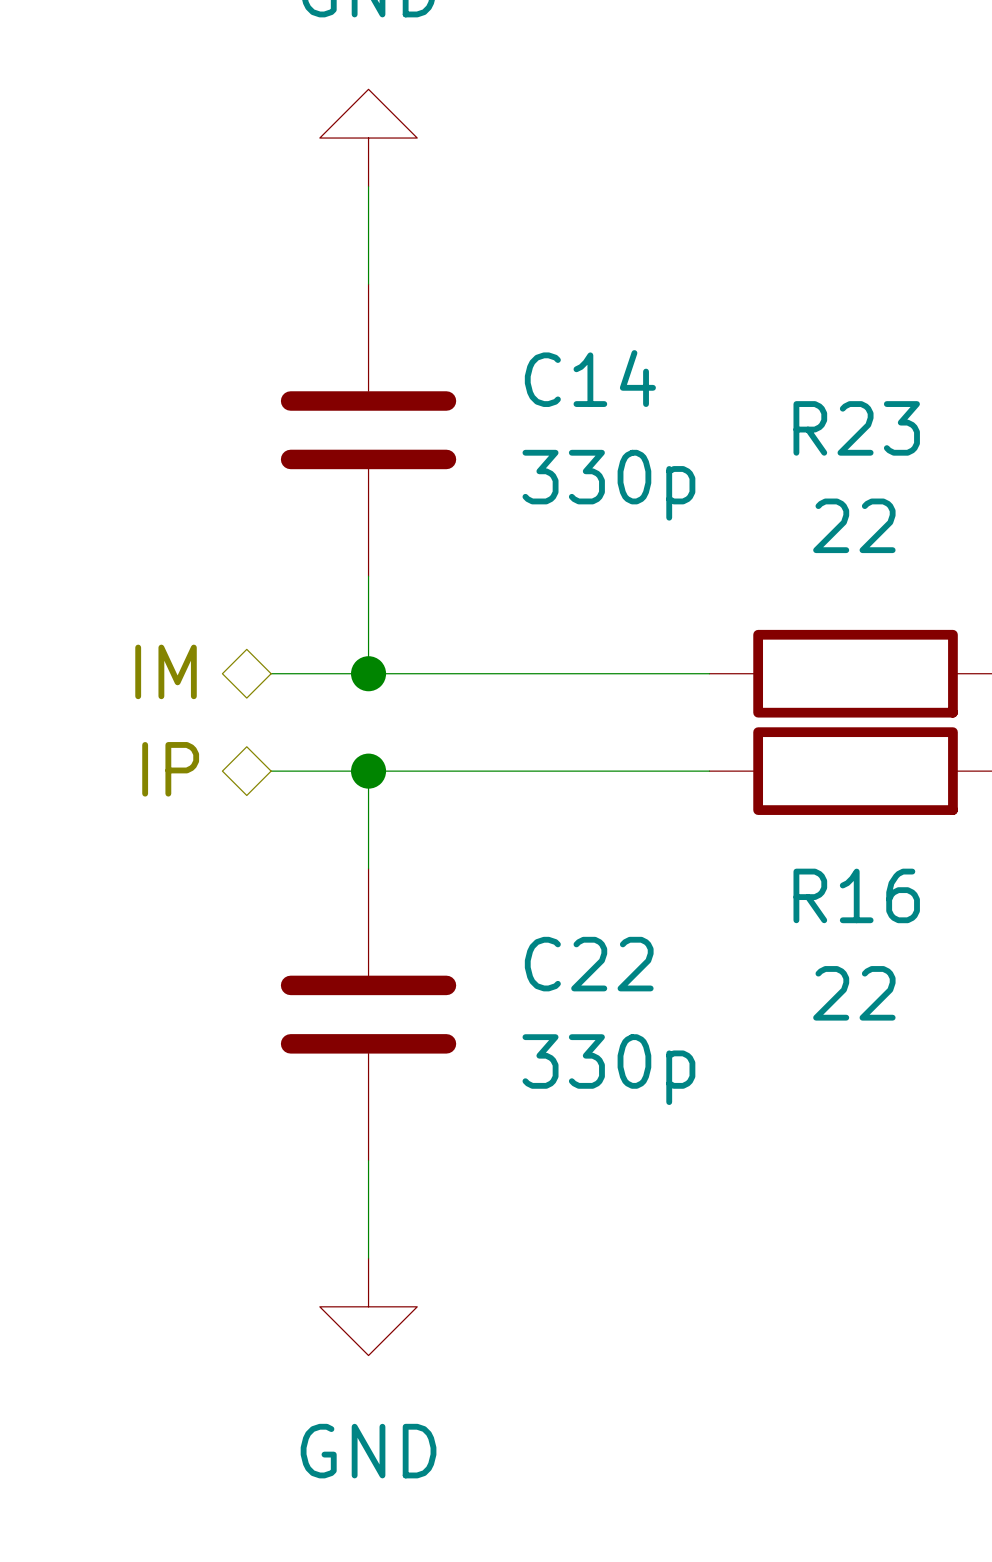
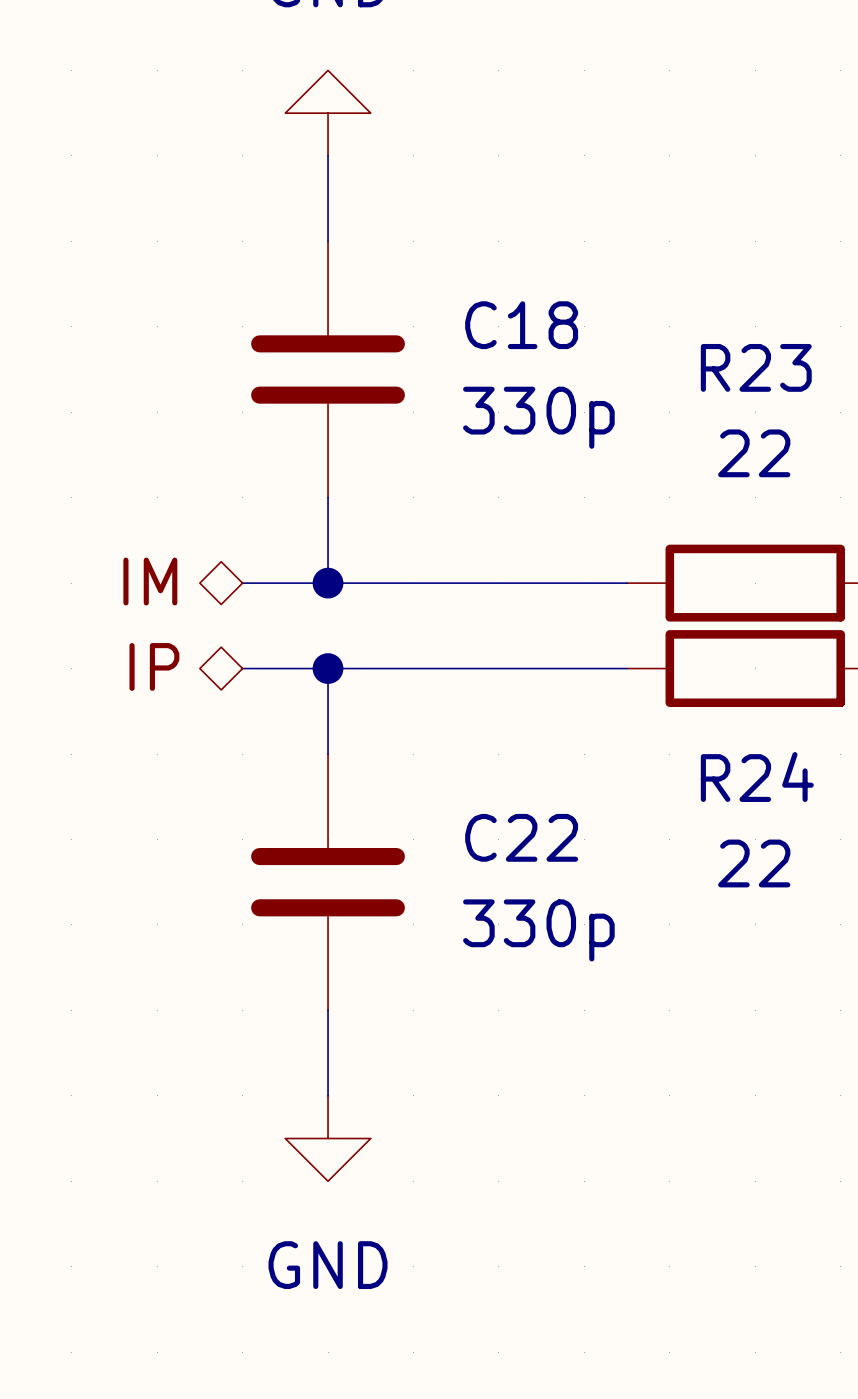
C14 name: C14 (590, 378) -> C18 (521, 325)
R16 name: R16 (856, 895) -> R24 (757, 777)

